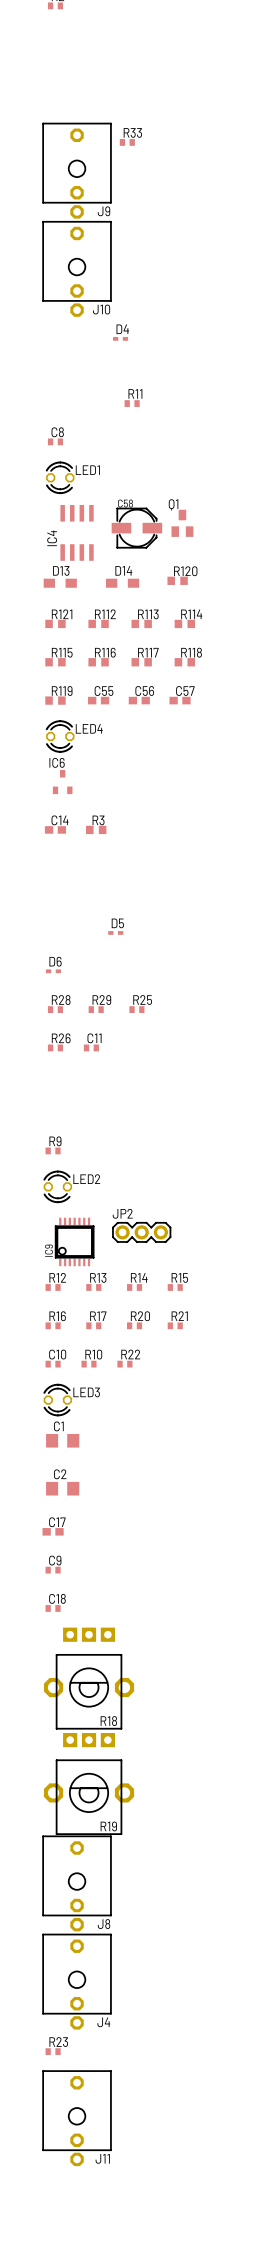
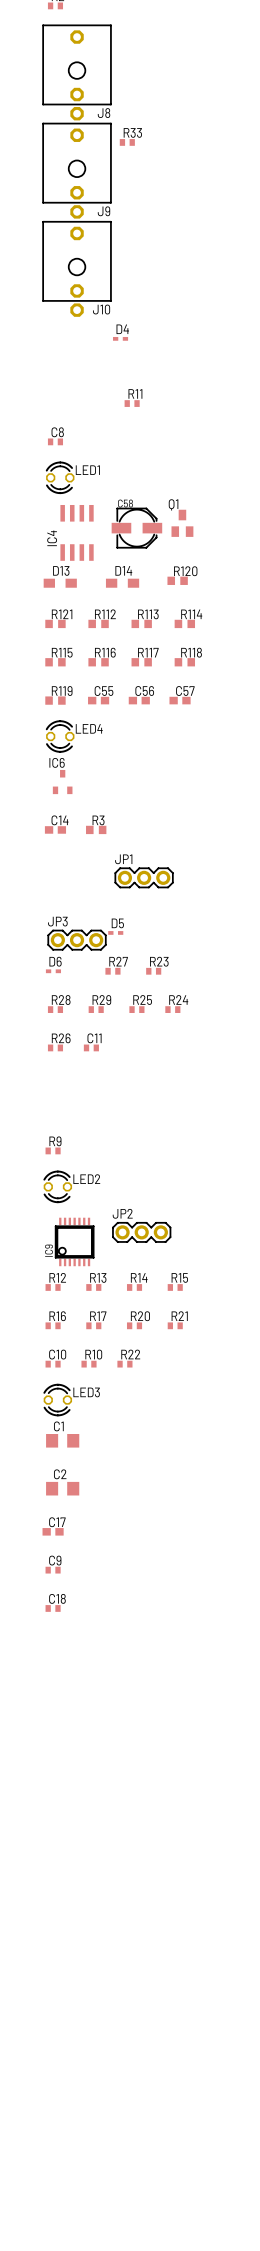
JP1: none -> (144, 877)
JP3: none -> (77, 940)
R27: none -> (112, 971)
R24: none -> (172, 1009)
R18: (89, 1678) -> none
R19: (89, 1783) -> none
J8 position: (77, 1883) -> (77, 72)
J4: (77, 1981) -> none
R23 position: (53, 2051) -> (153, 971)
J11: (77, 2118) -> none

